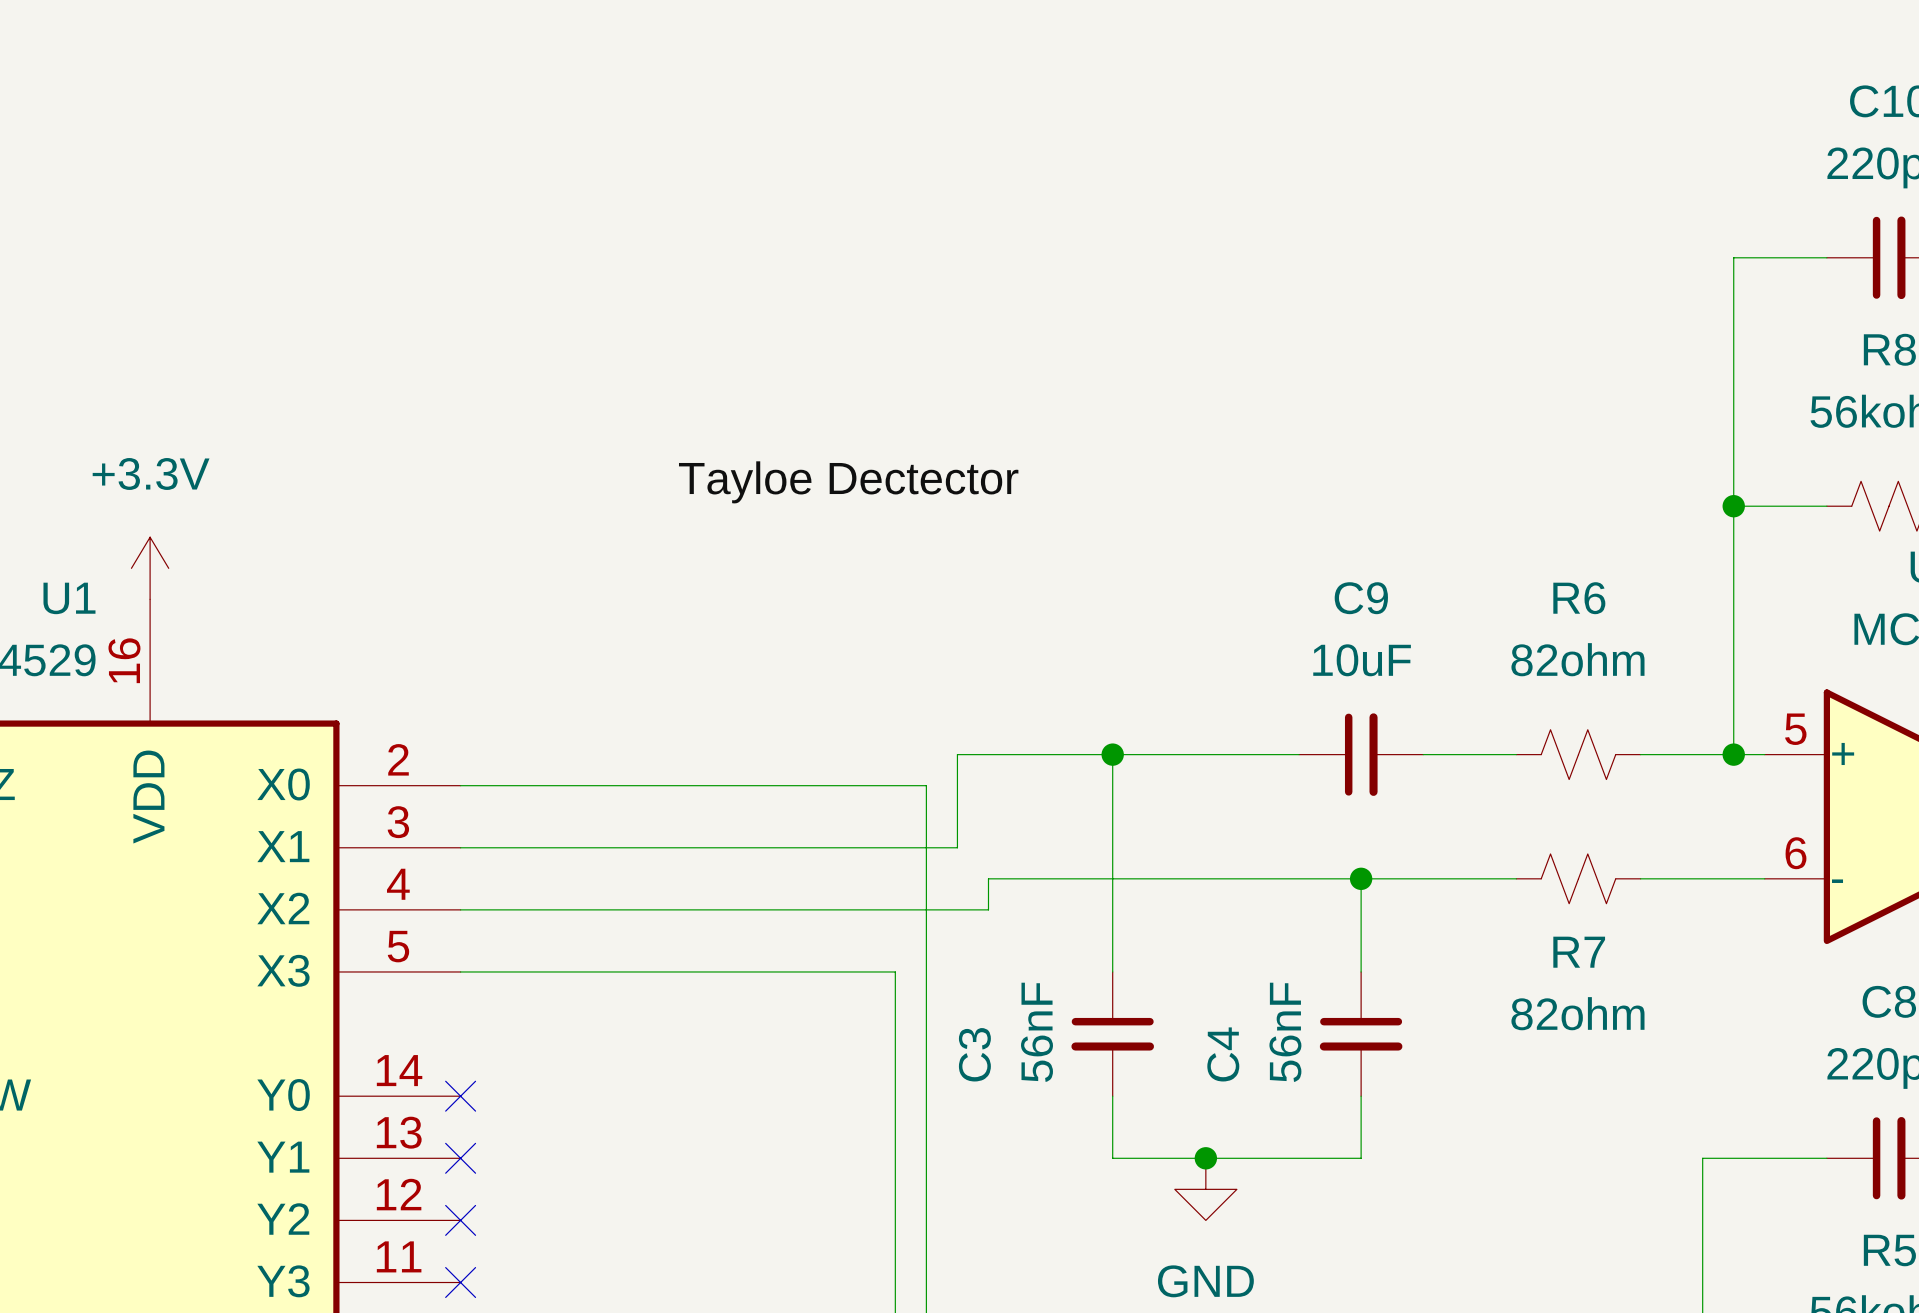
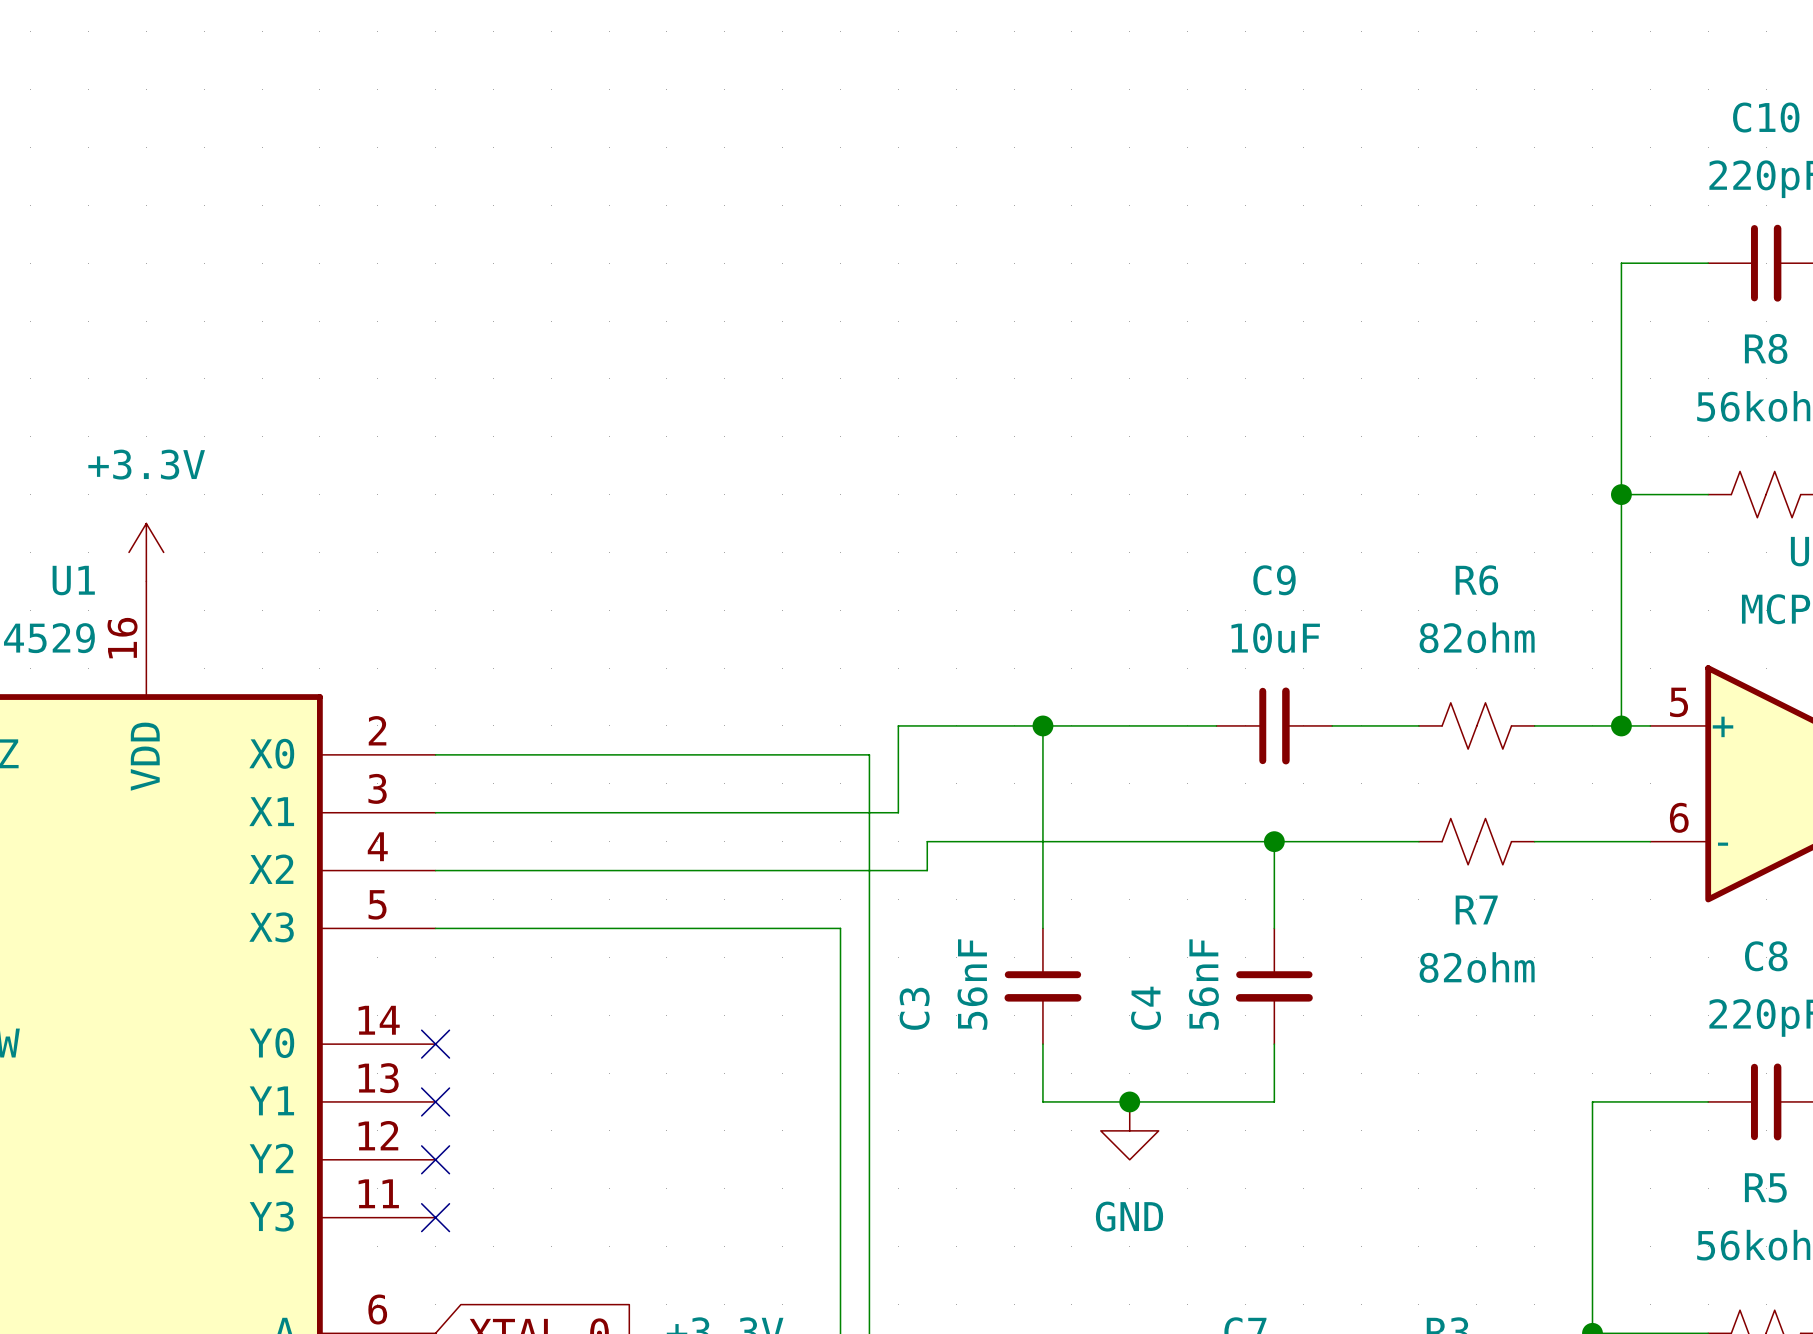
label: Tayloe Dectector (848, 482) -> none

